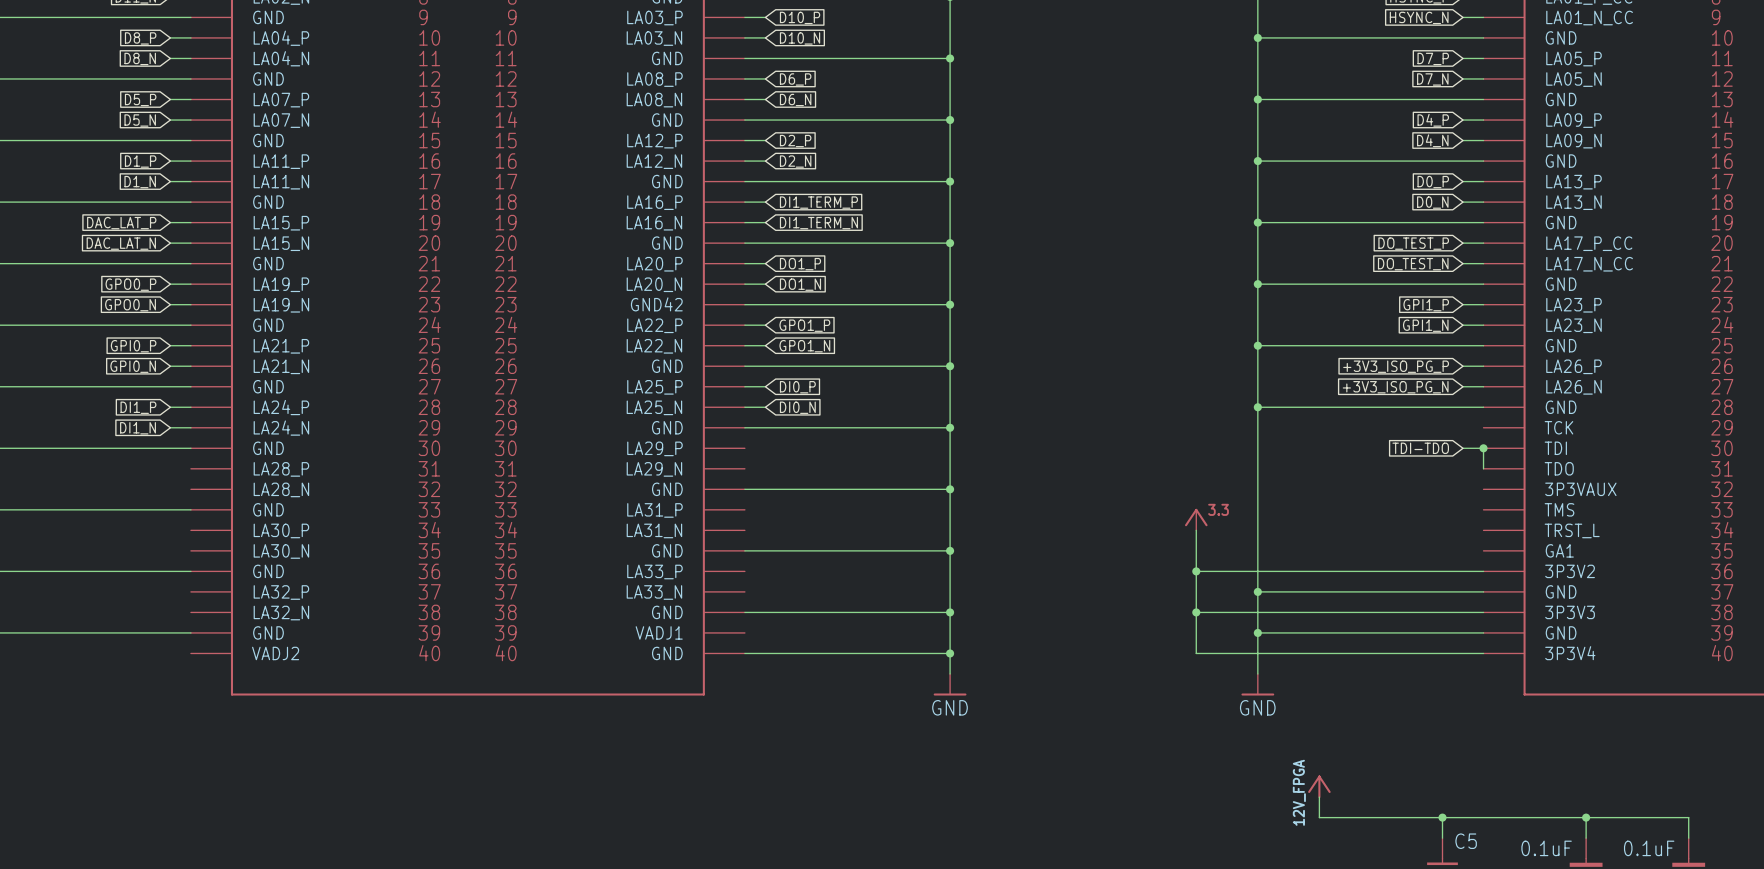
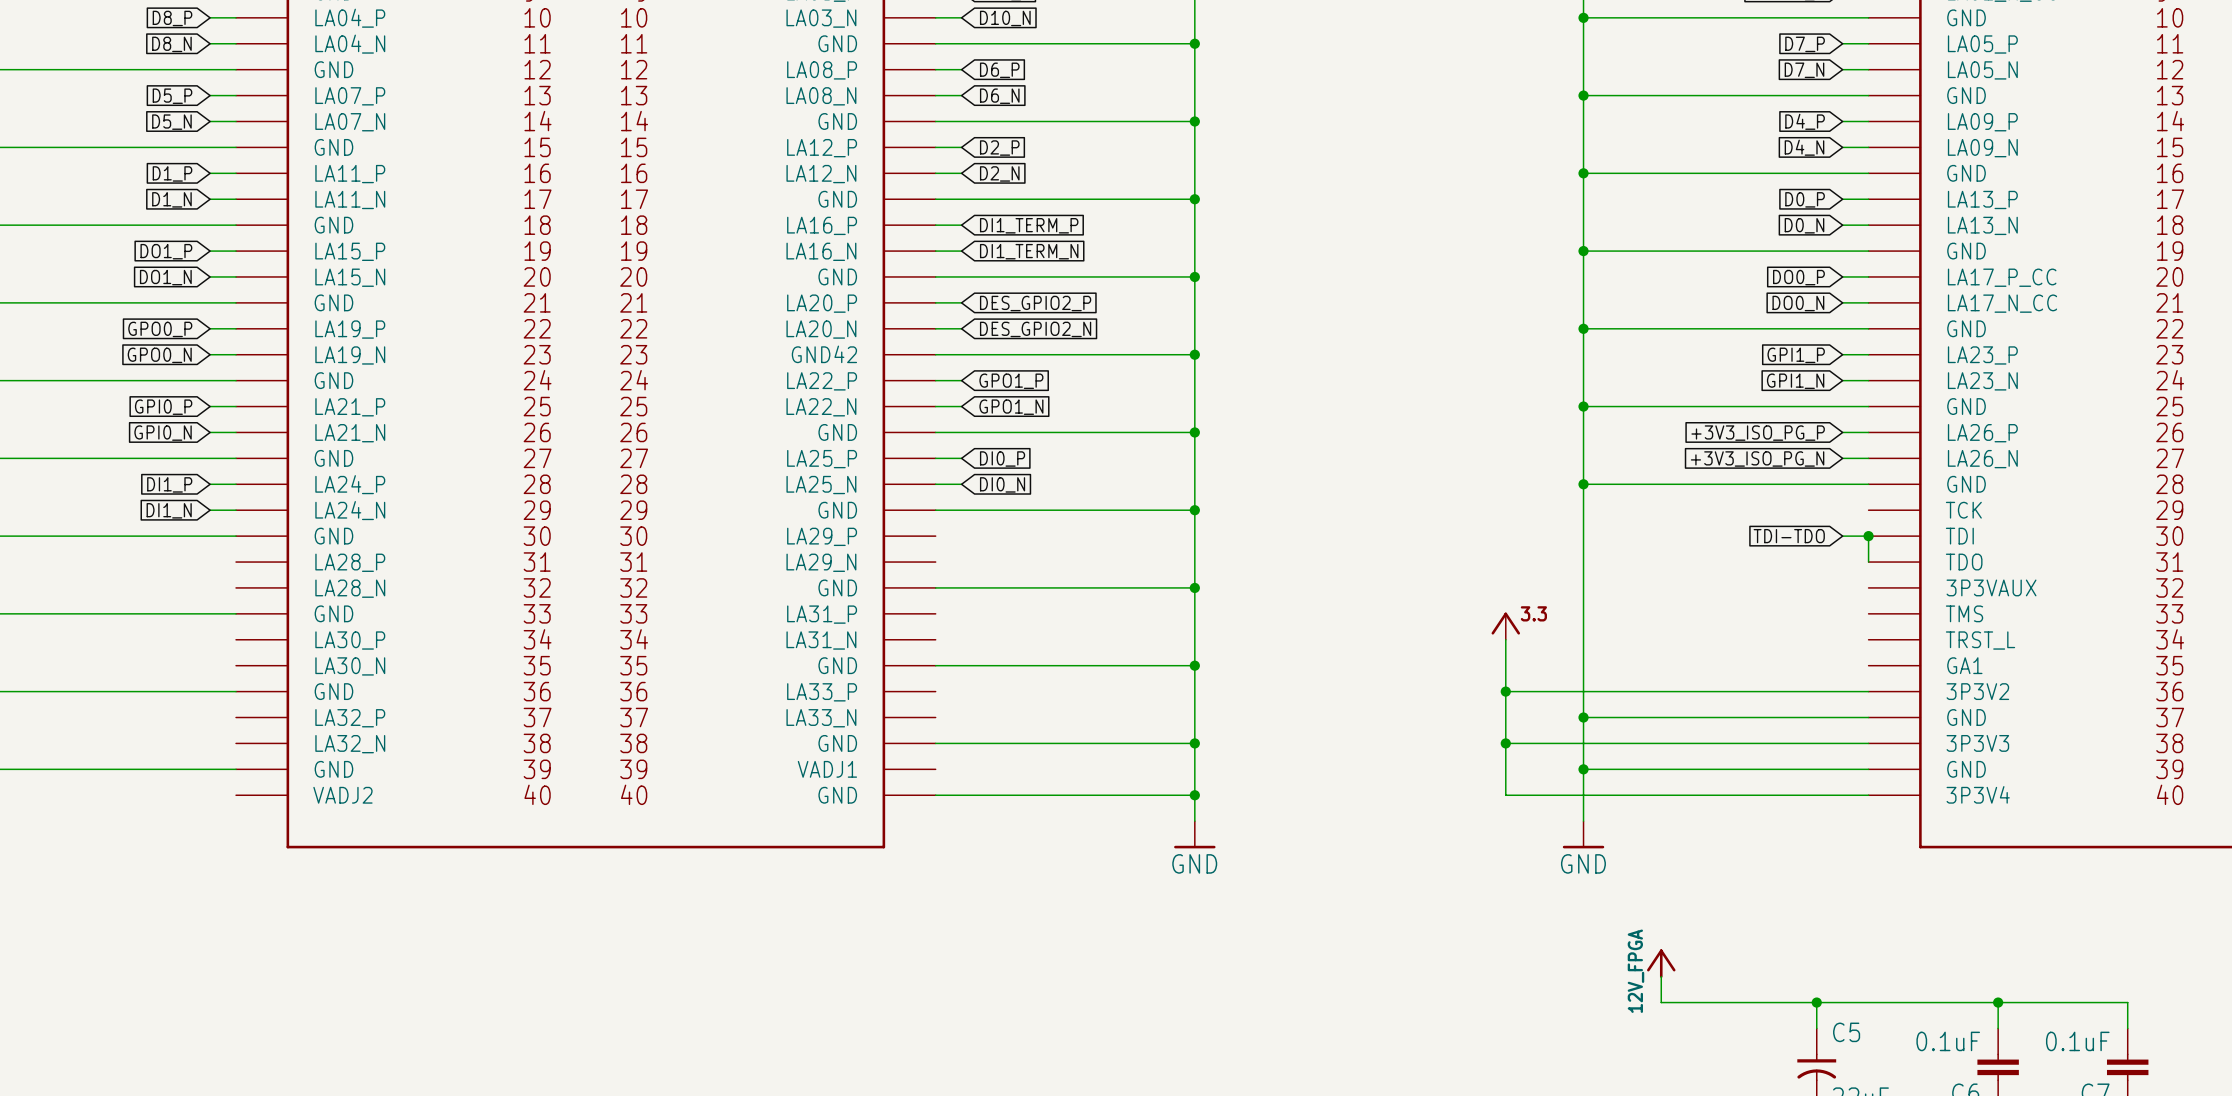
global label: DAC_LAT_P (121, 223) -> DO1_P (166, 251)
global label: DAC_LAT_N (121, 243) -> DO1_N (165, 277)
global label: DO_TEST_P (1413, 243) -> DO0_P (1798, 277)
global label: DO1_P (800, 264) -> DES_GPIO2_P (1035, 303)
global label: DO_TEST_N (1413, 264) -> DO0_N (1798, 303)
global label: DO1_N (800, 284) -> DES_GPIO2_N (1035, 329)

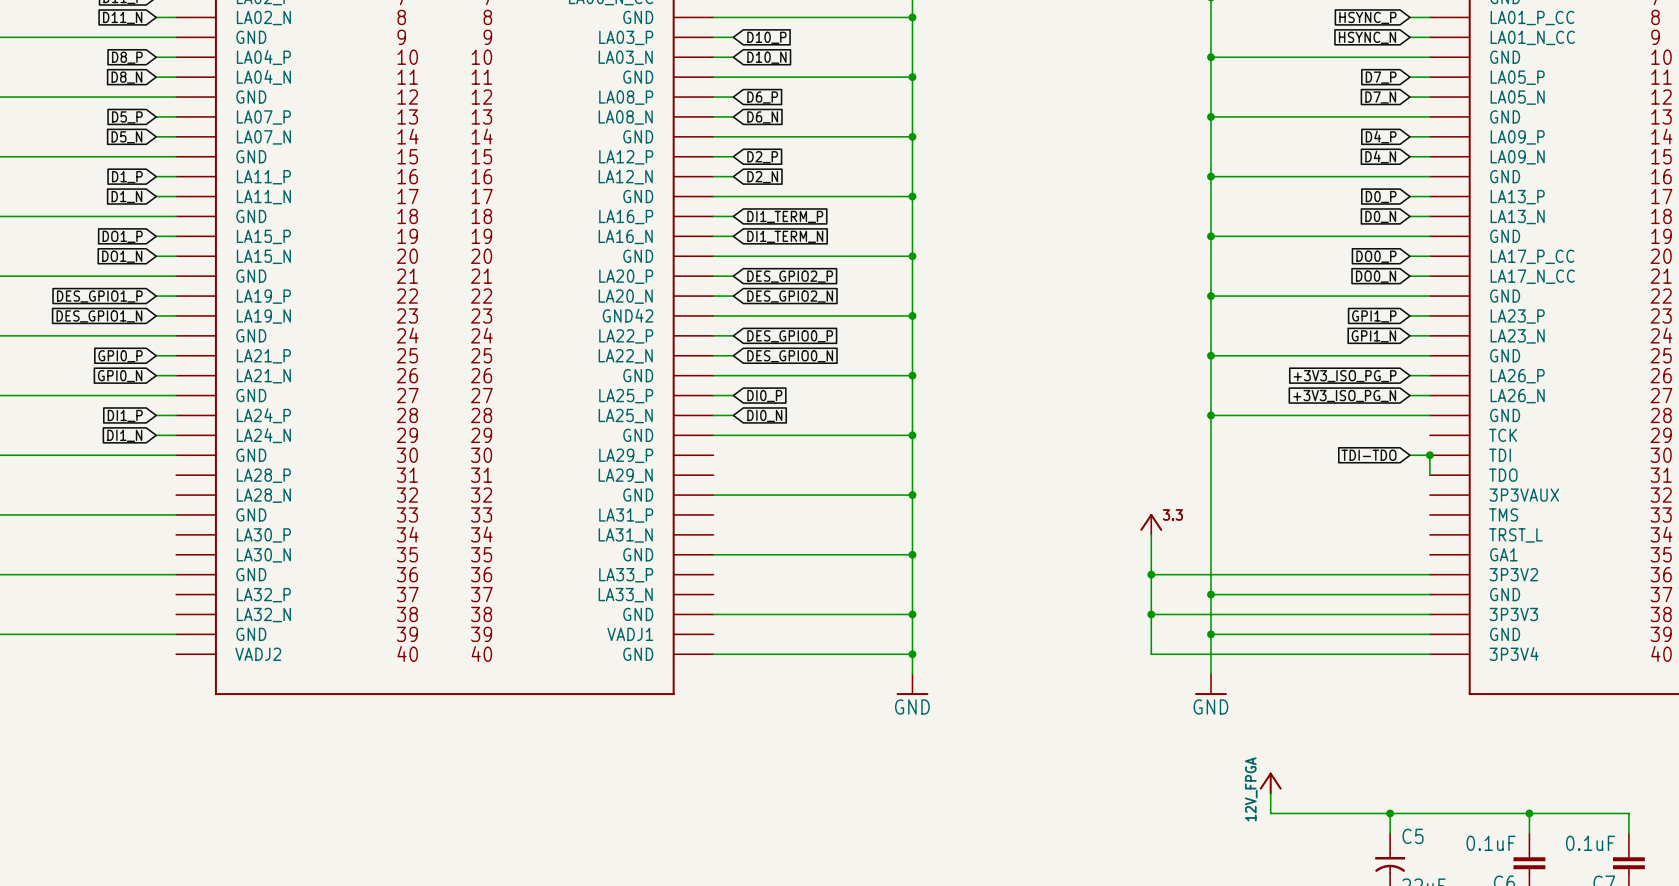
global label: GPO0_P (160, 329) -> DES_GPIO1_P (99, 296)
global label: GPO0_N (159, 355) -> DES_GPIO1_N (99, 316)
global label: GPO1_P (1011, 381) -> DES_GPIO0_P (790, 336)
global label: GPO1_N (1011, 407) -> DES_GPIO0_N (790, 356)

